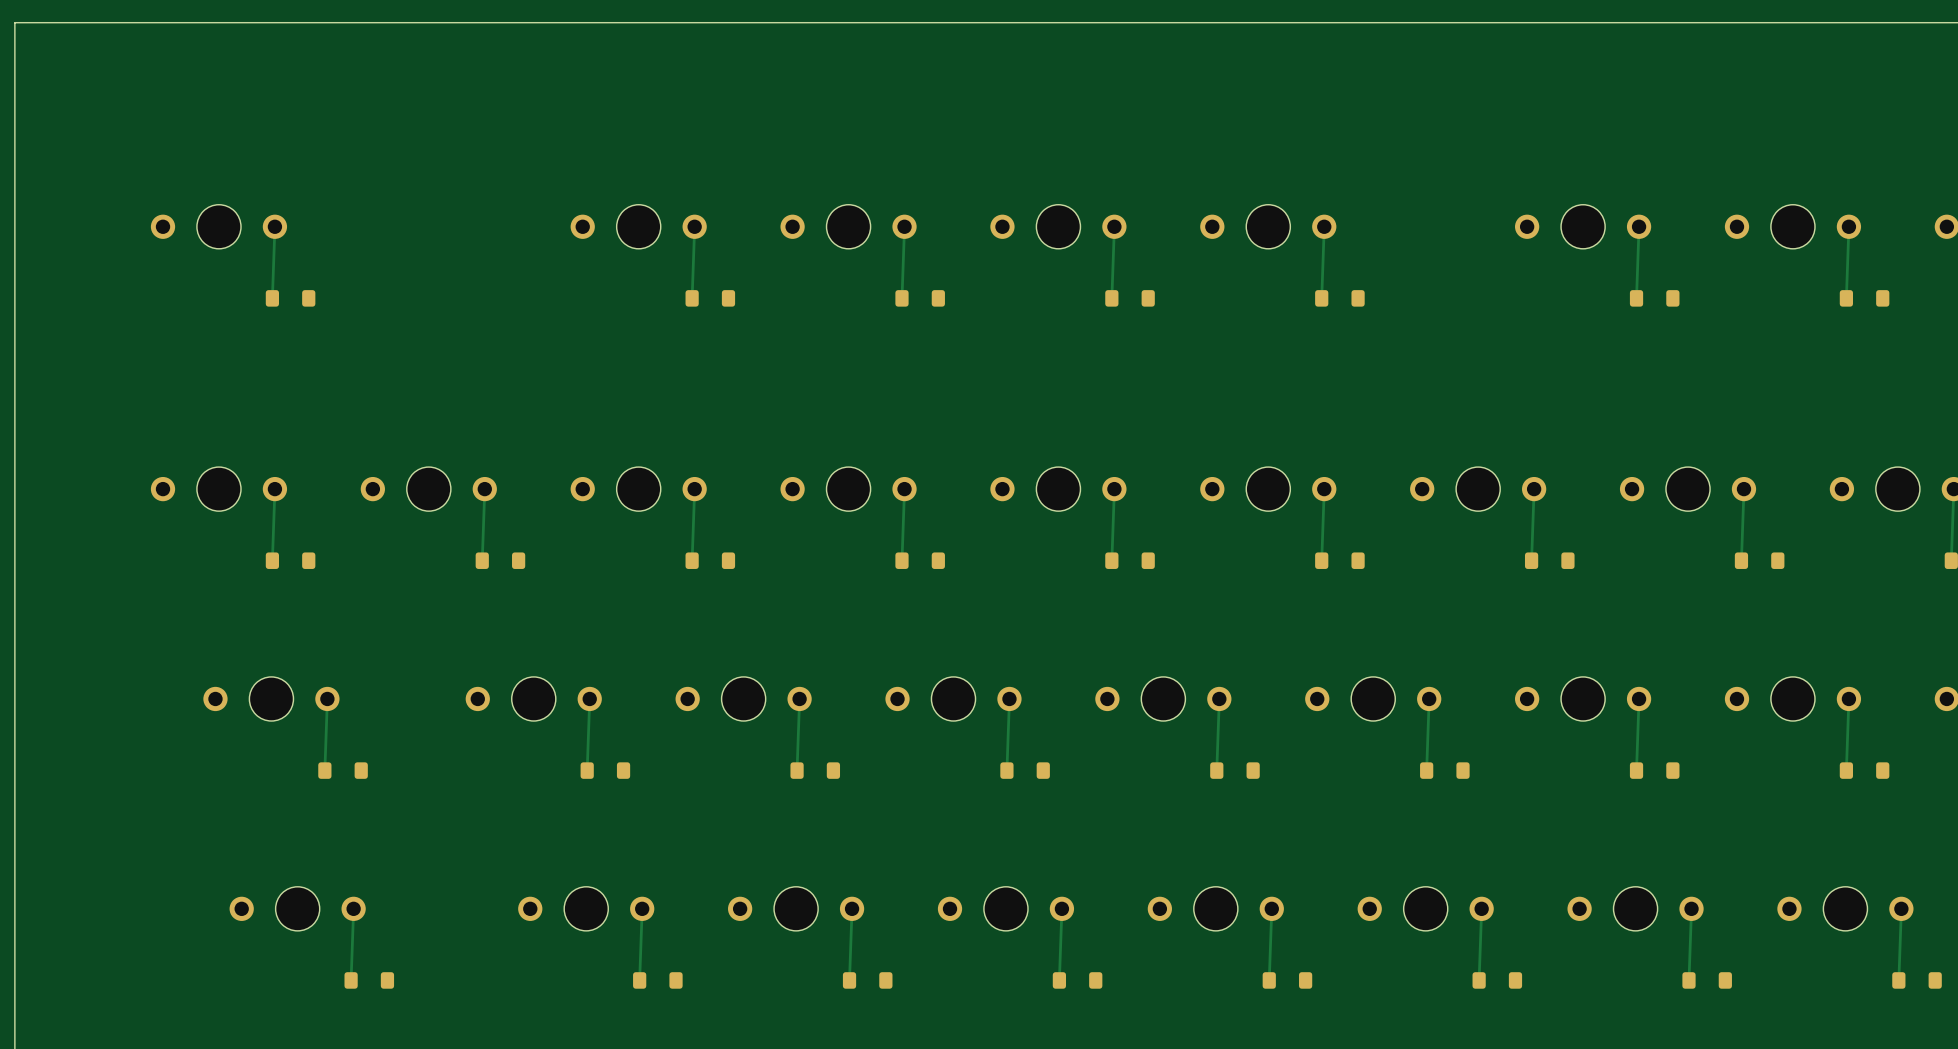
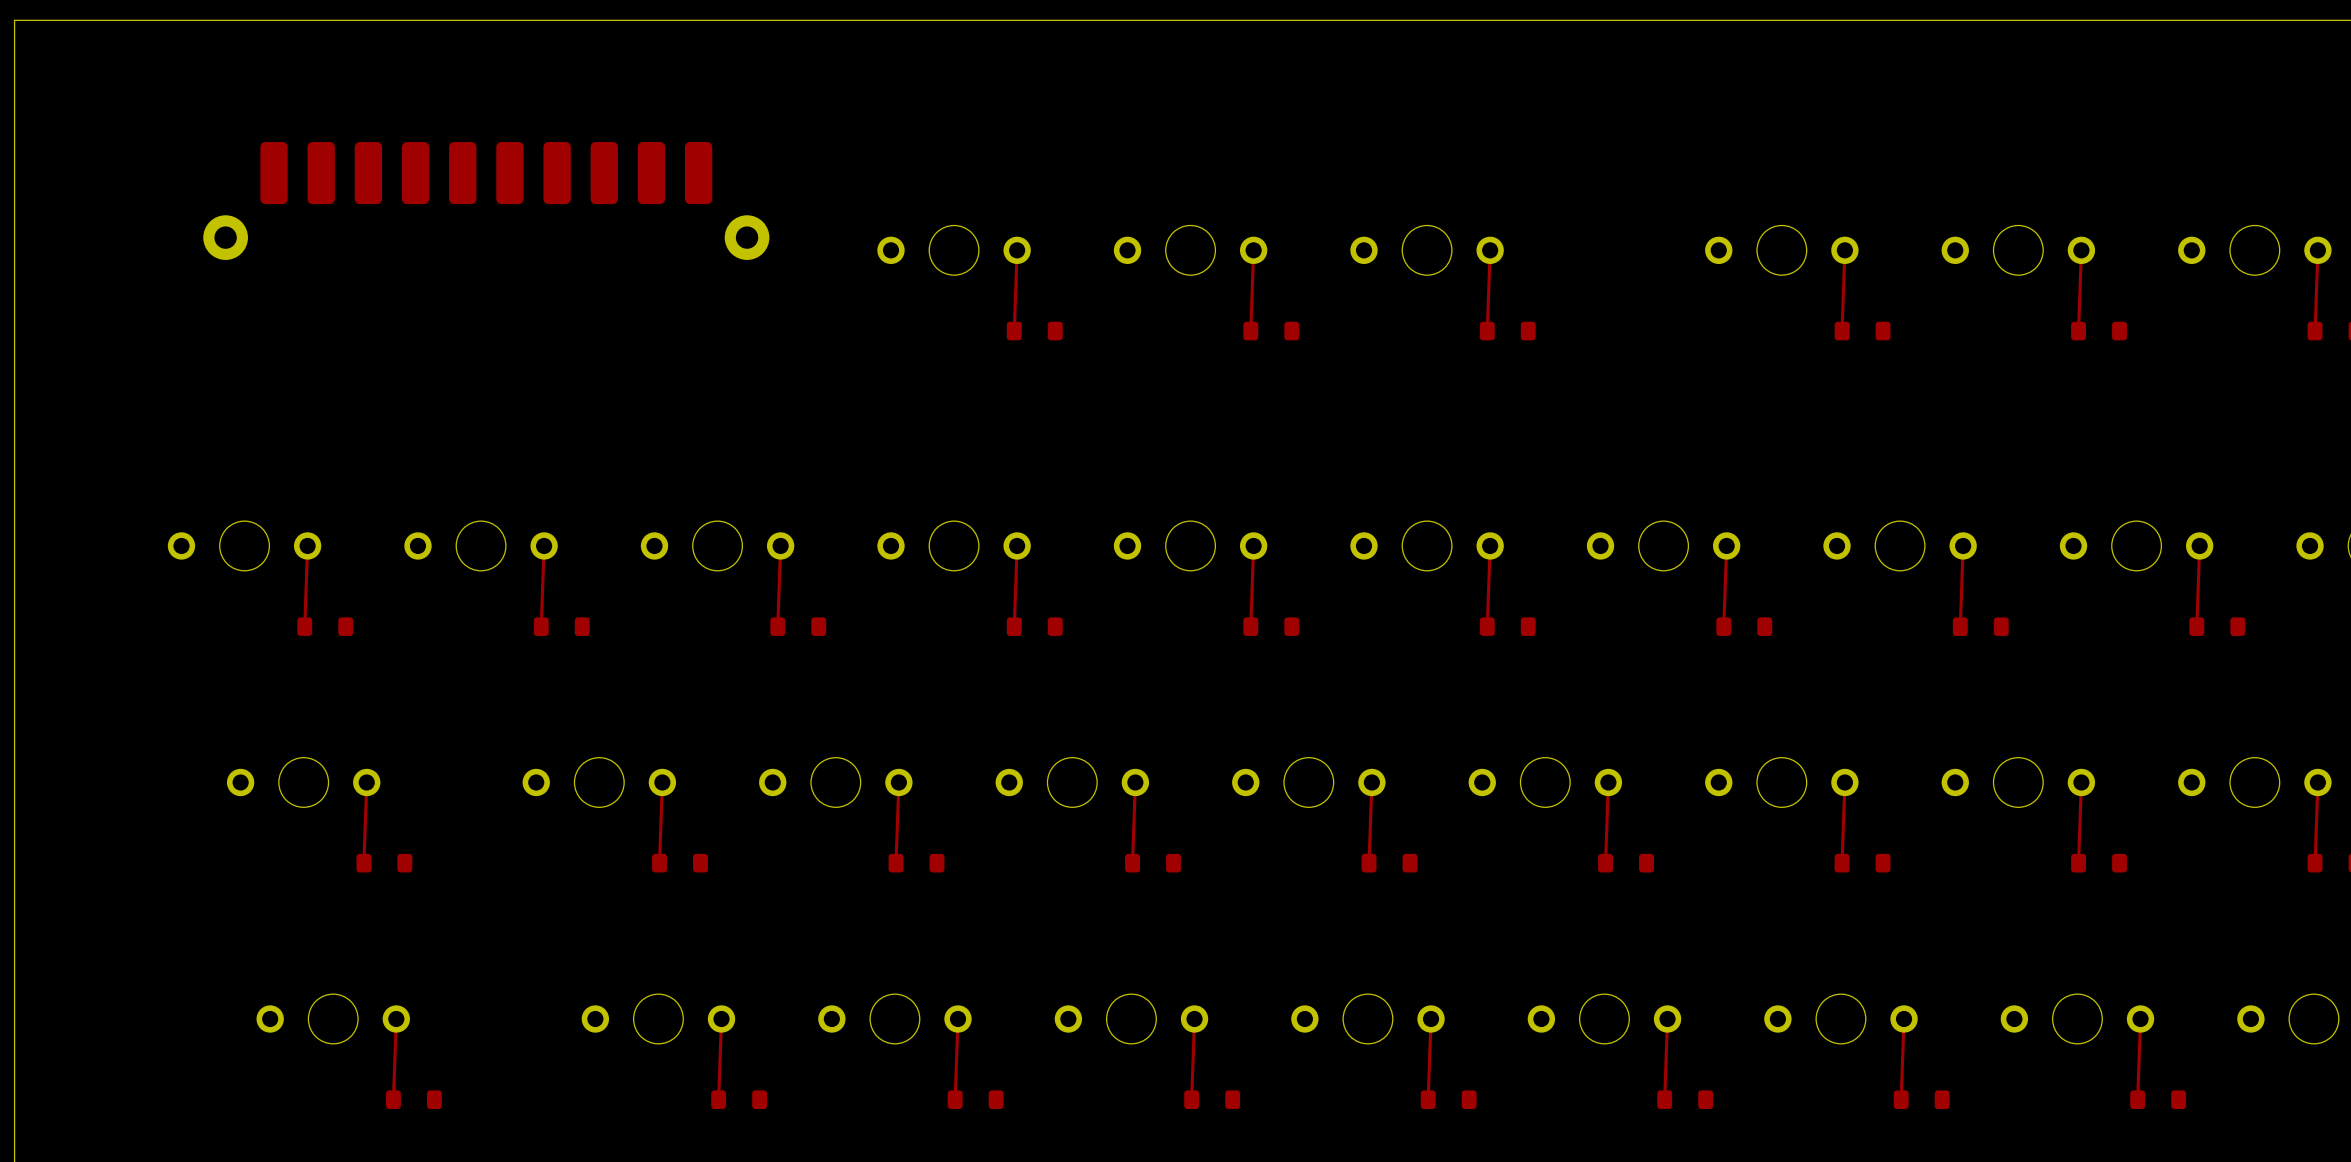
part: none -> (486, 200)
part: (218, 226) -> none
track: (274, 226) (272, 298) -> none
part: (638, 226) -> none
track: (694, 226) (692, 298) -> none
part: (290, 298) -> none
part: (710, 298) -> none

